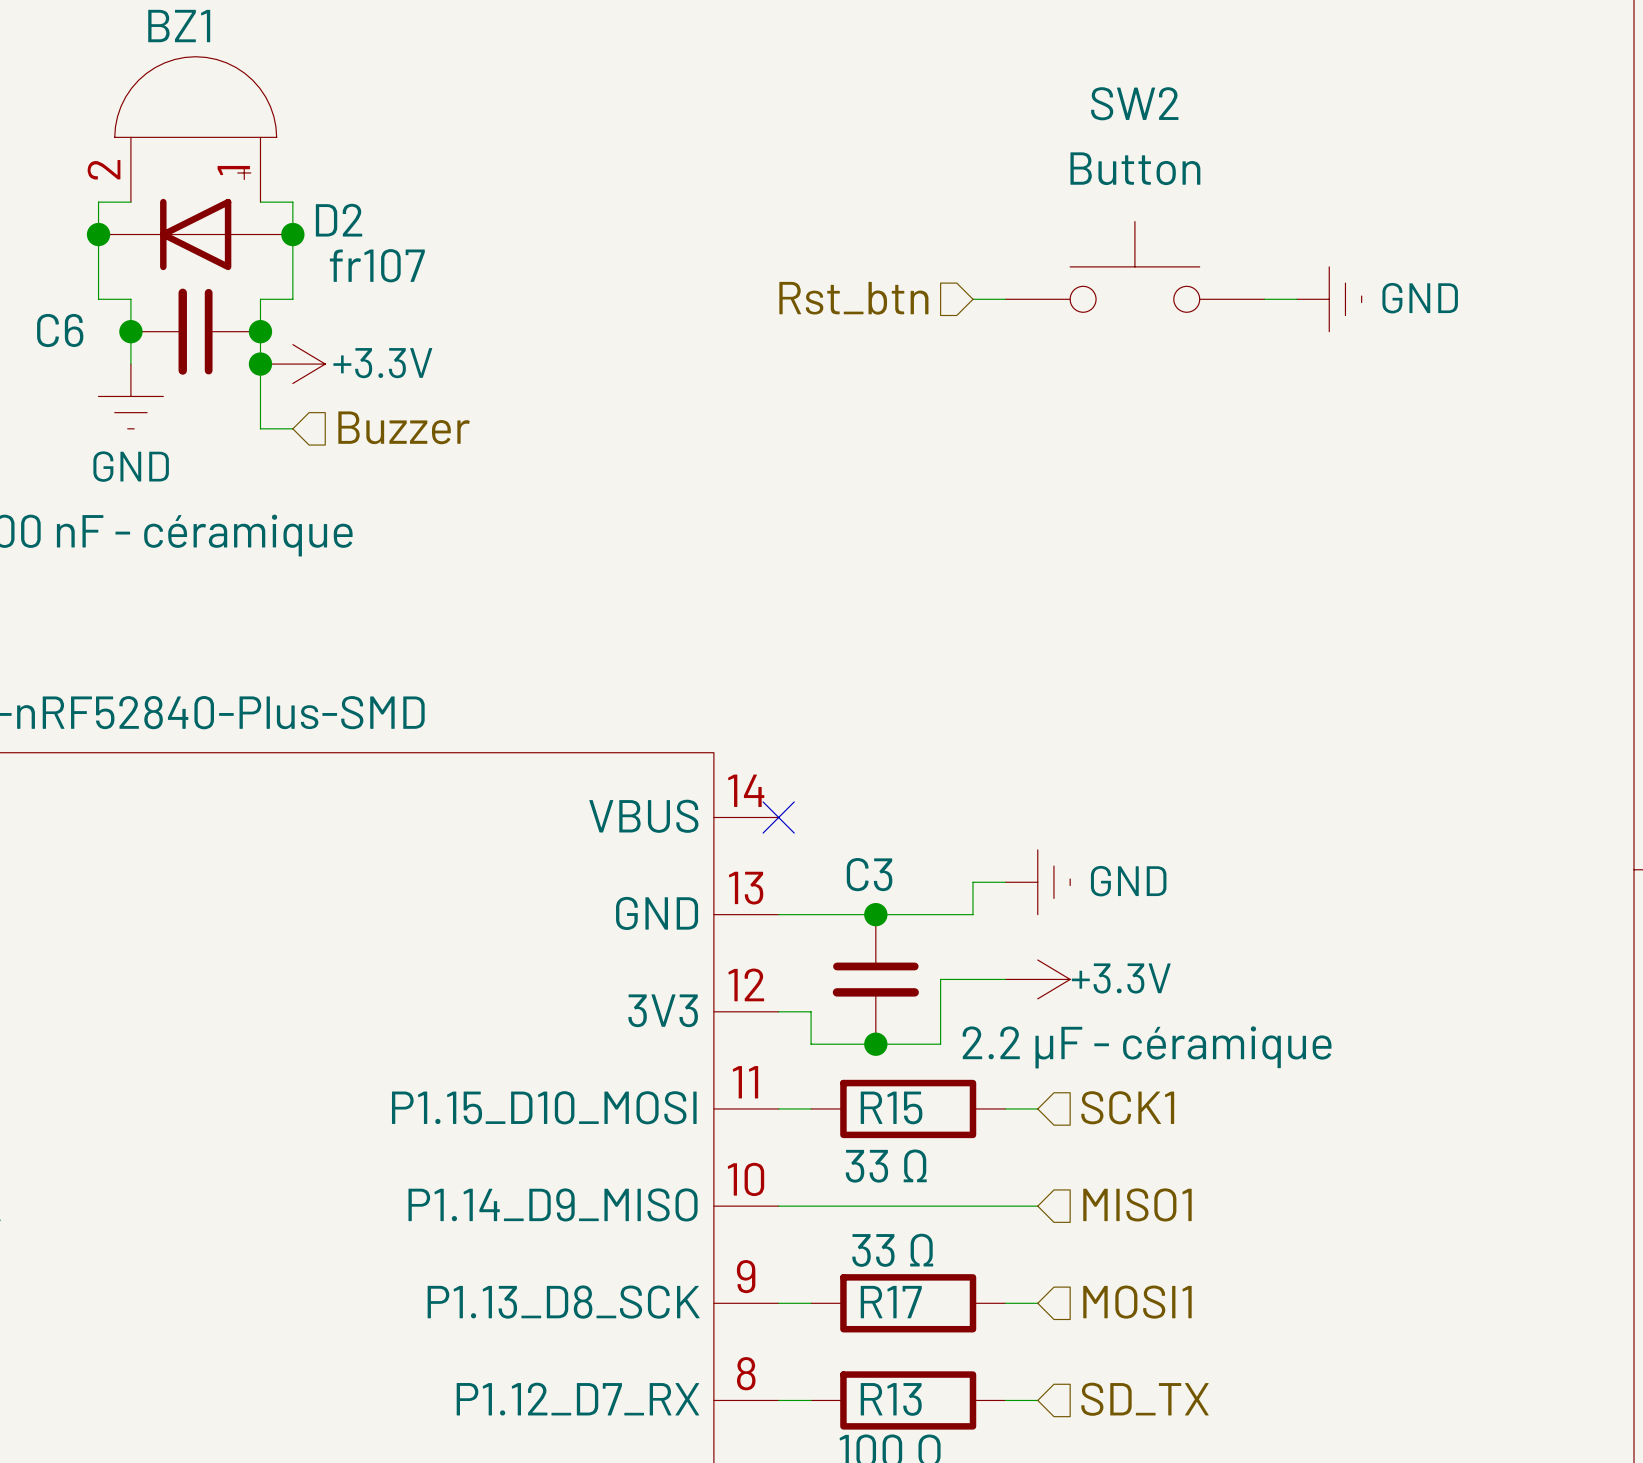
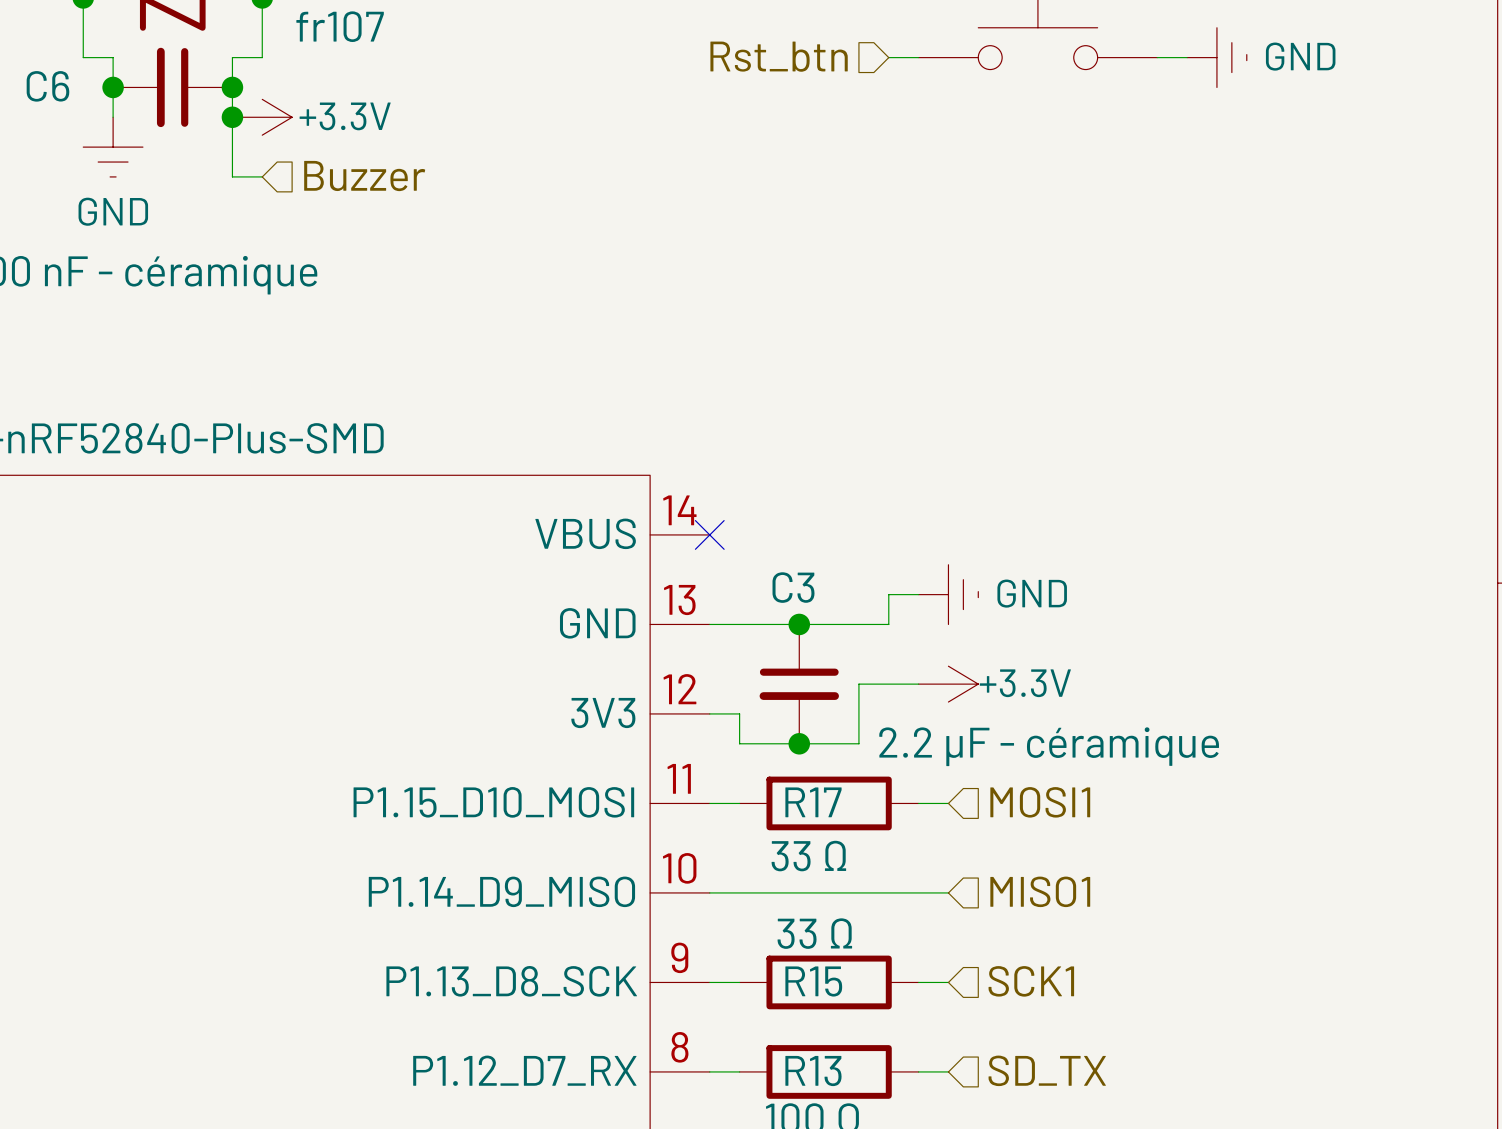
R15 name: R15 (891, 1107) -> R17 (813, 802)
hierarchical label: SCK1 (1127, 1107) -> MOSI1 (1040, 802)
R17 name: R17 (891, 1302) -> R15 (813, 981)
hierarchical label: MOSI1 (1137, 1302) -> SCK1 (1031, 981)

